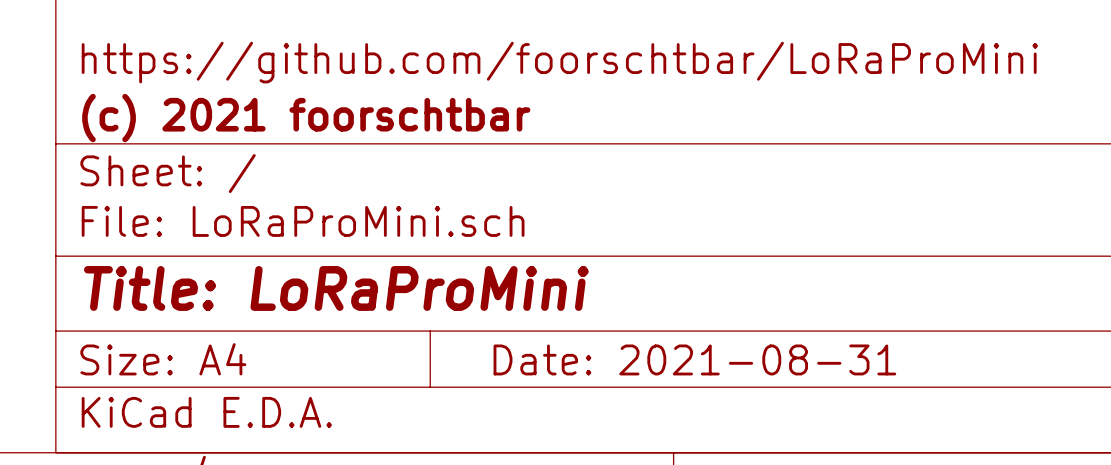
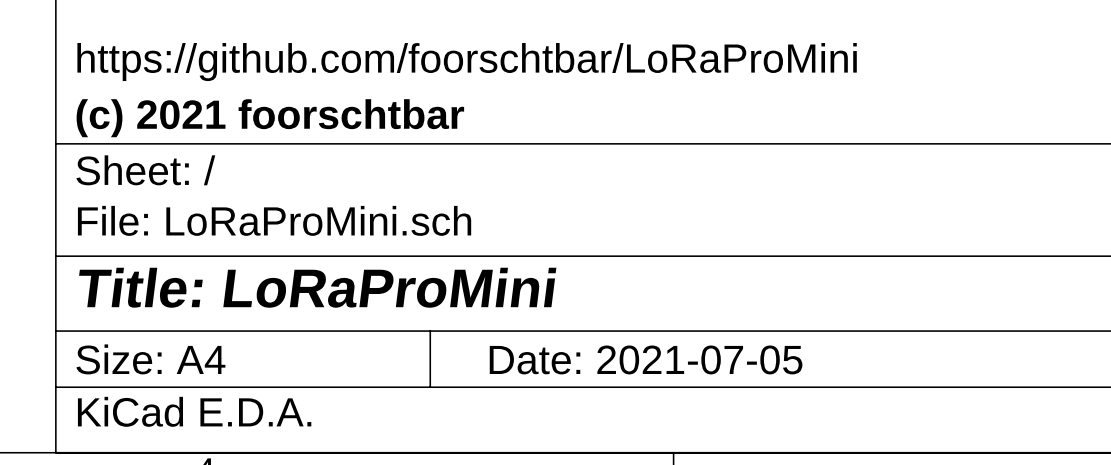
title block: Date: 2021-08-31 (694, 359) -> Date: 2021-07-05 (646, 359)

